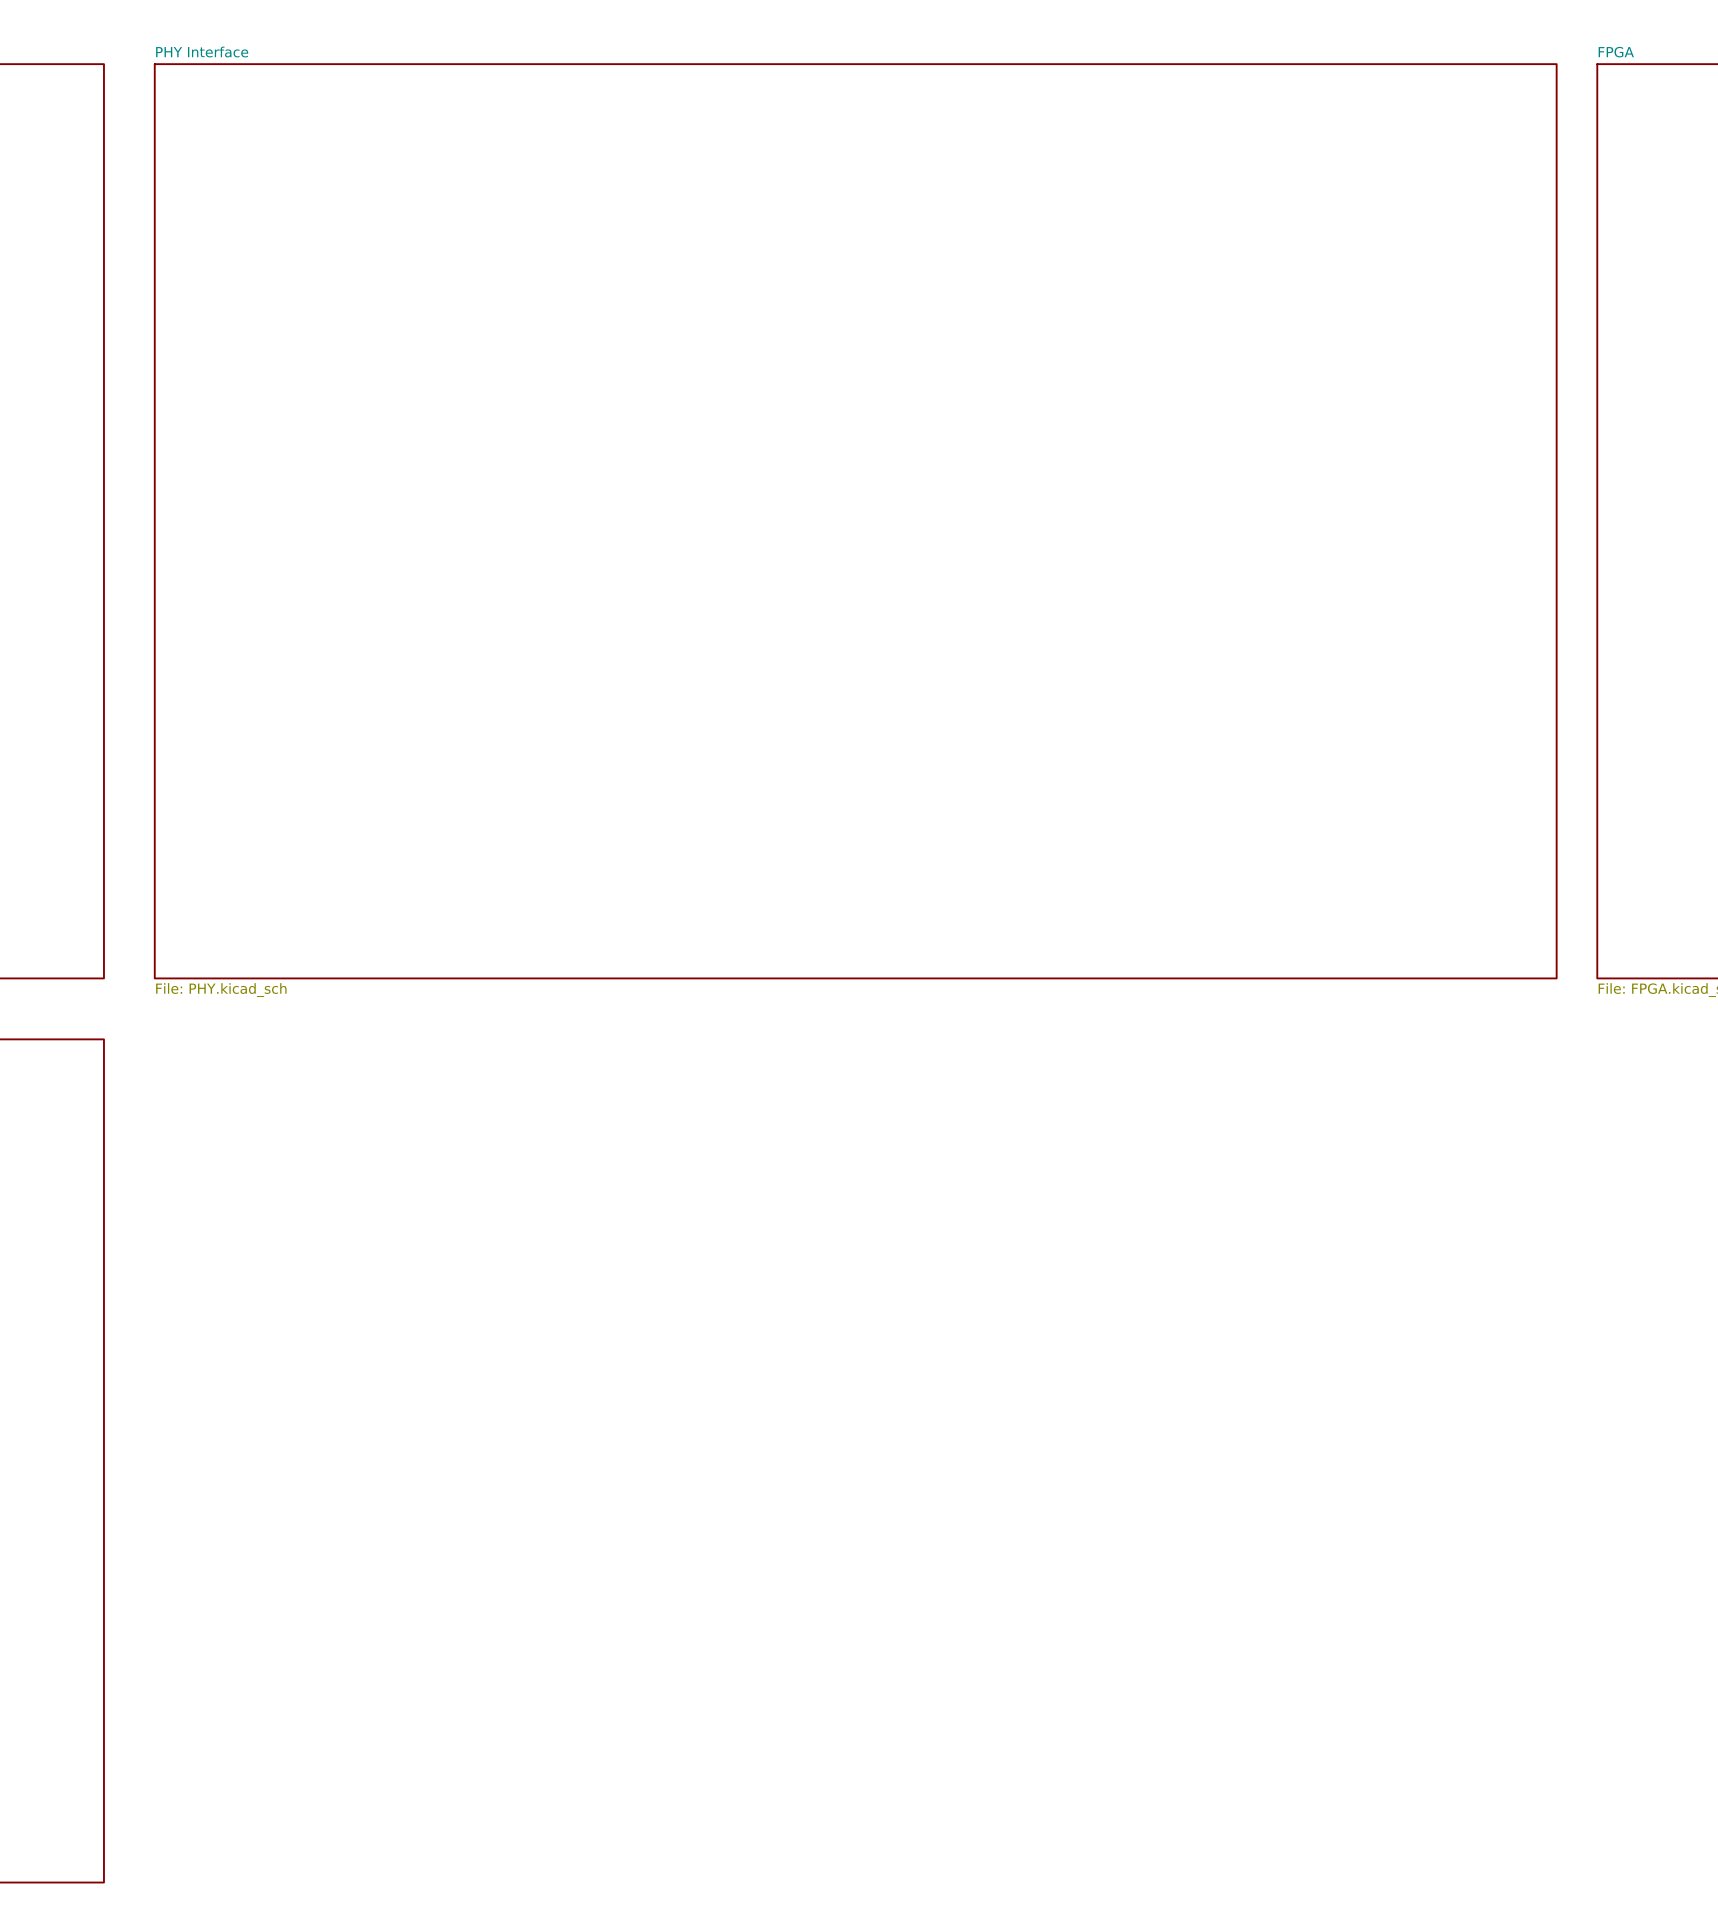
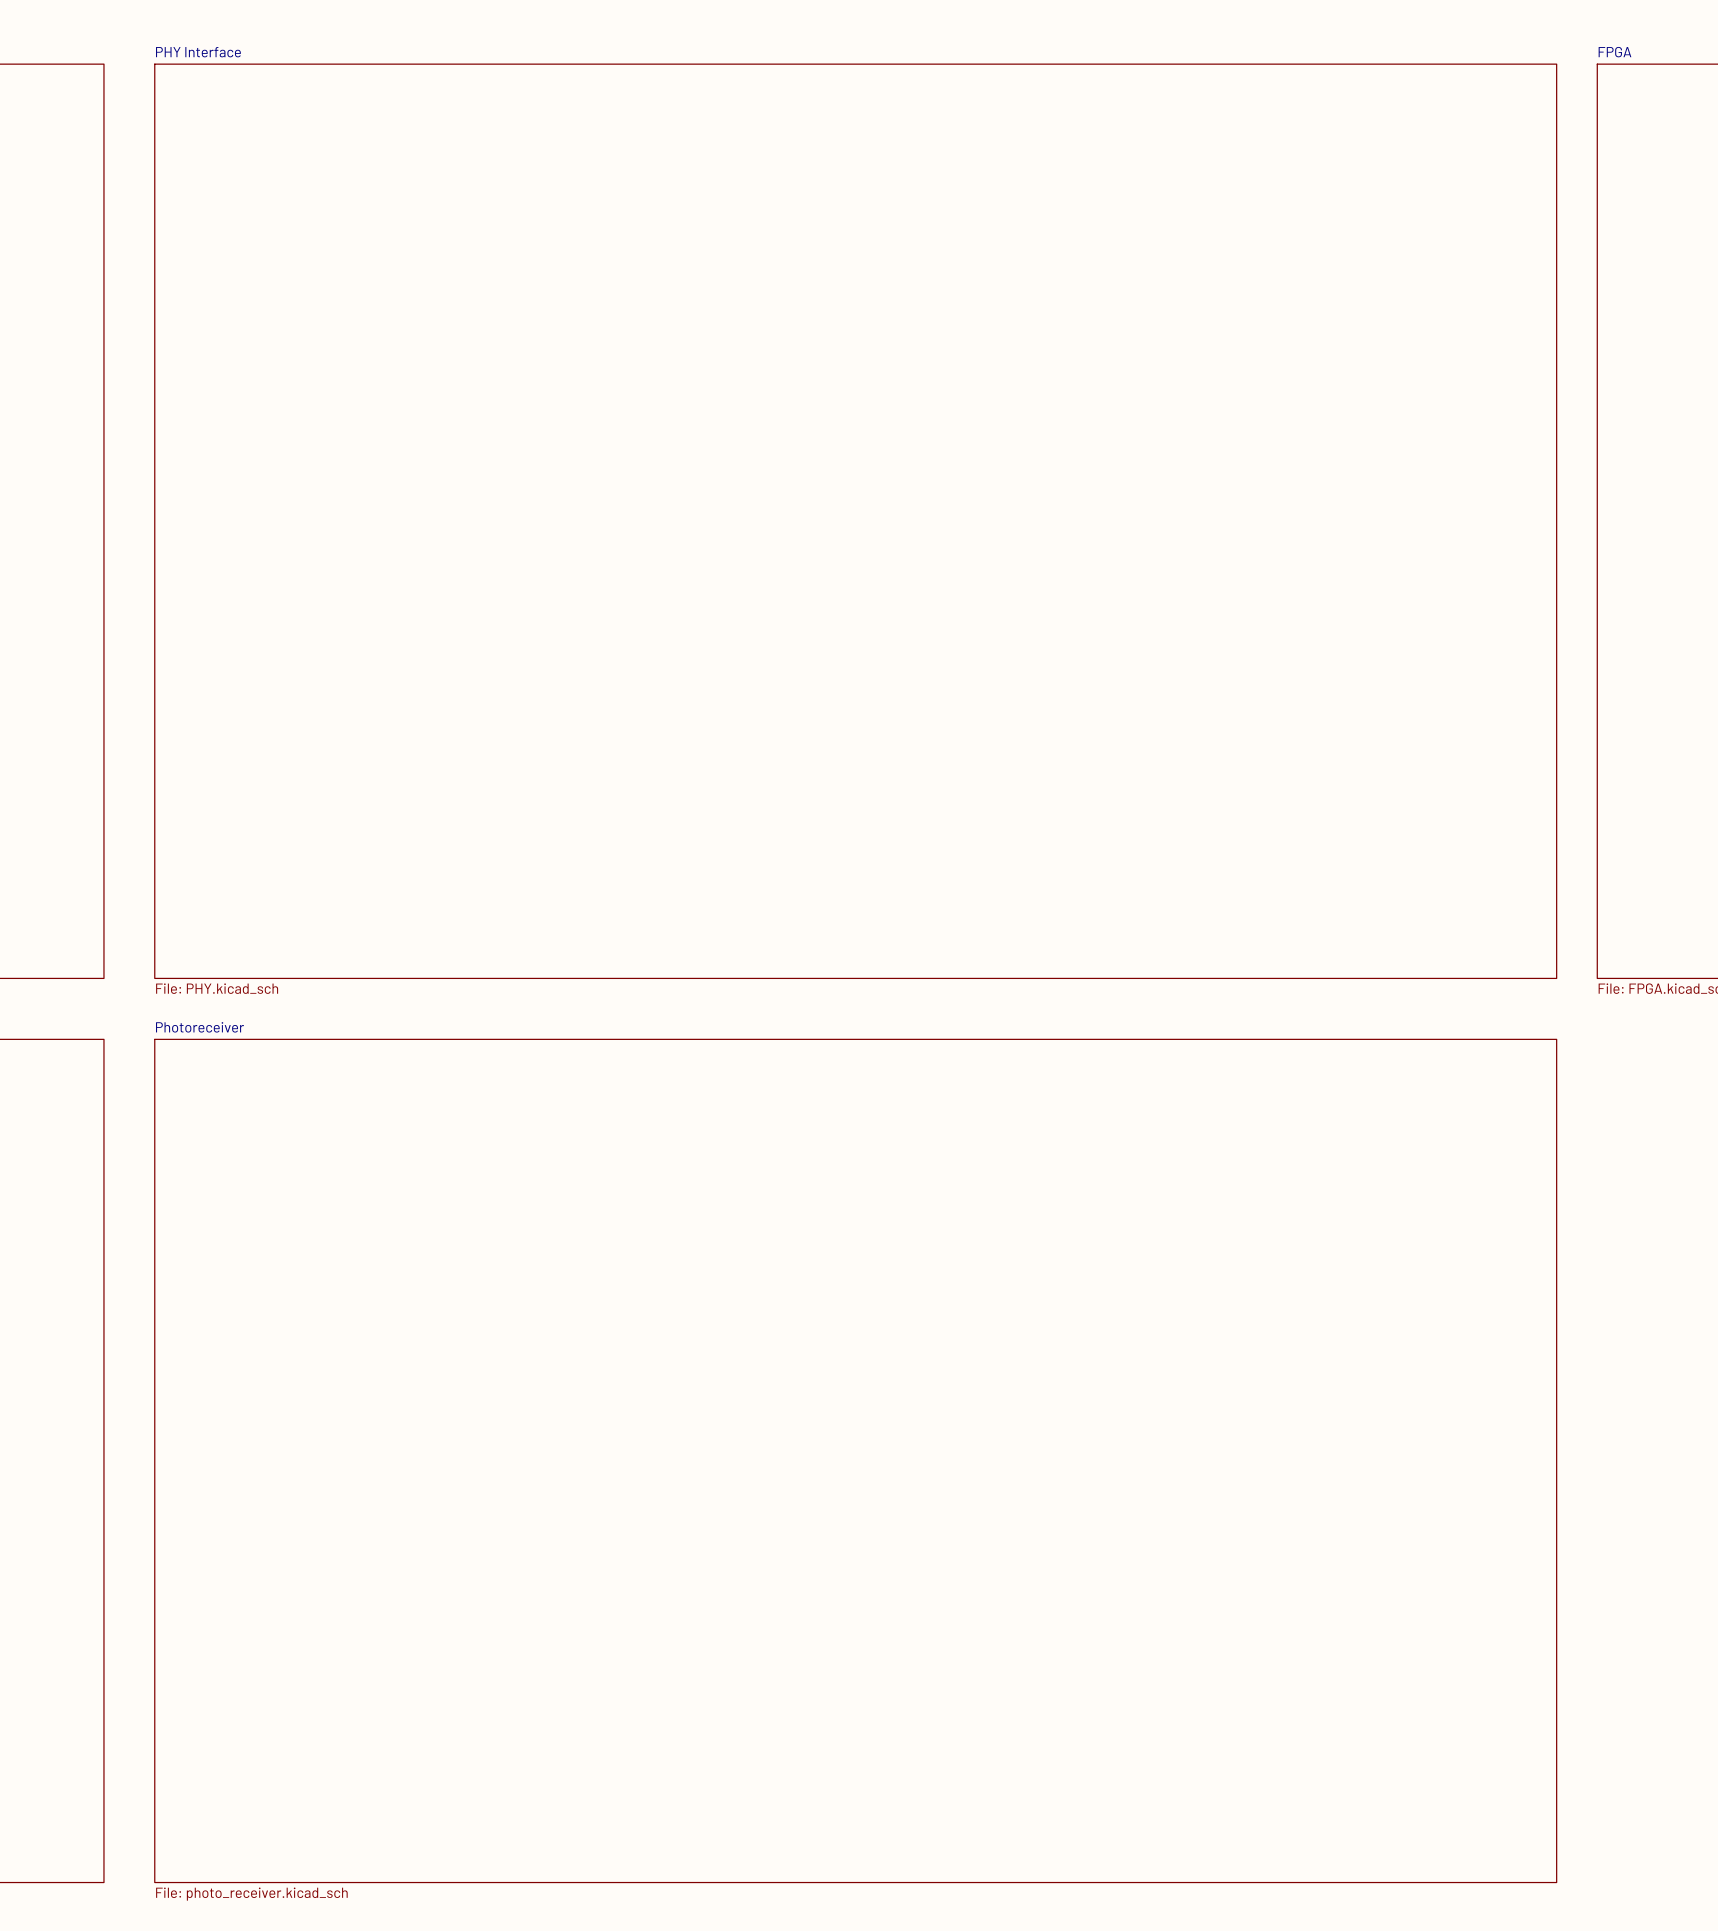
sheet Photoreceiver: none -> File: photo_receiver.kicad_sch (855, 1460)

